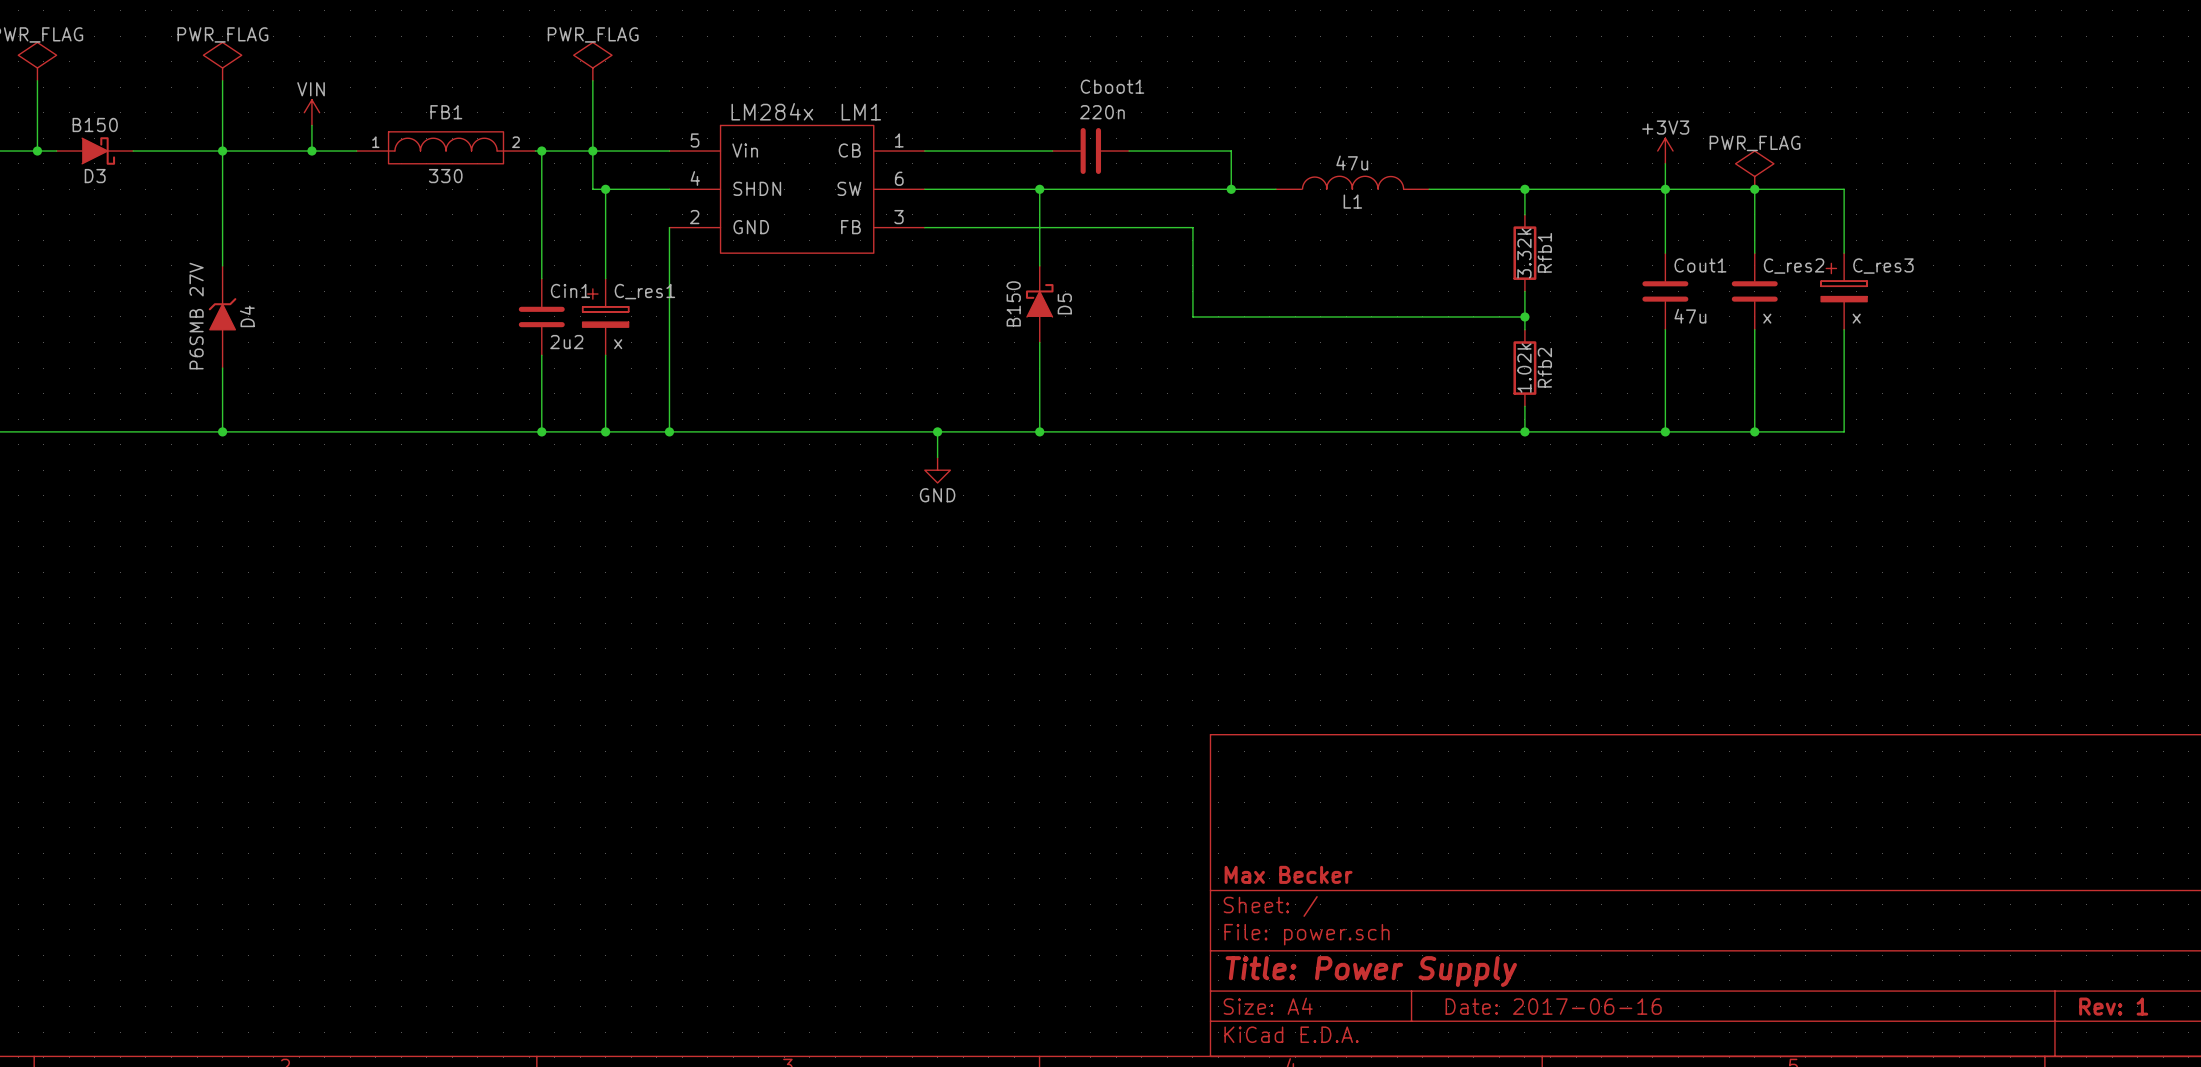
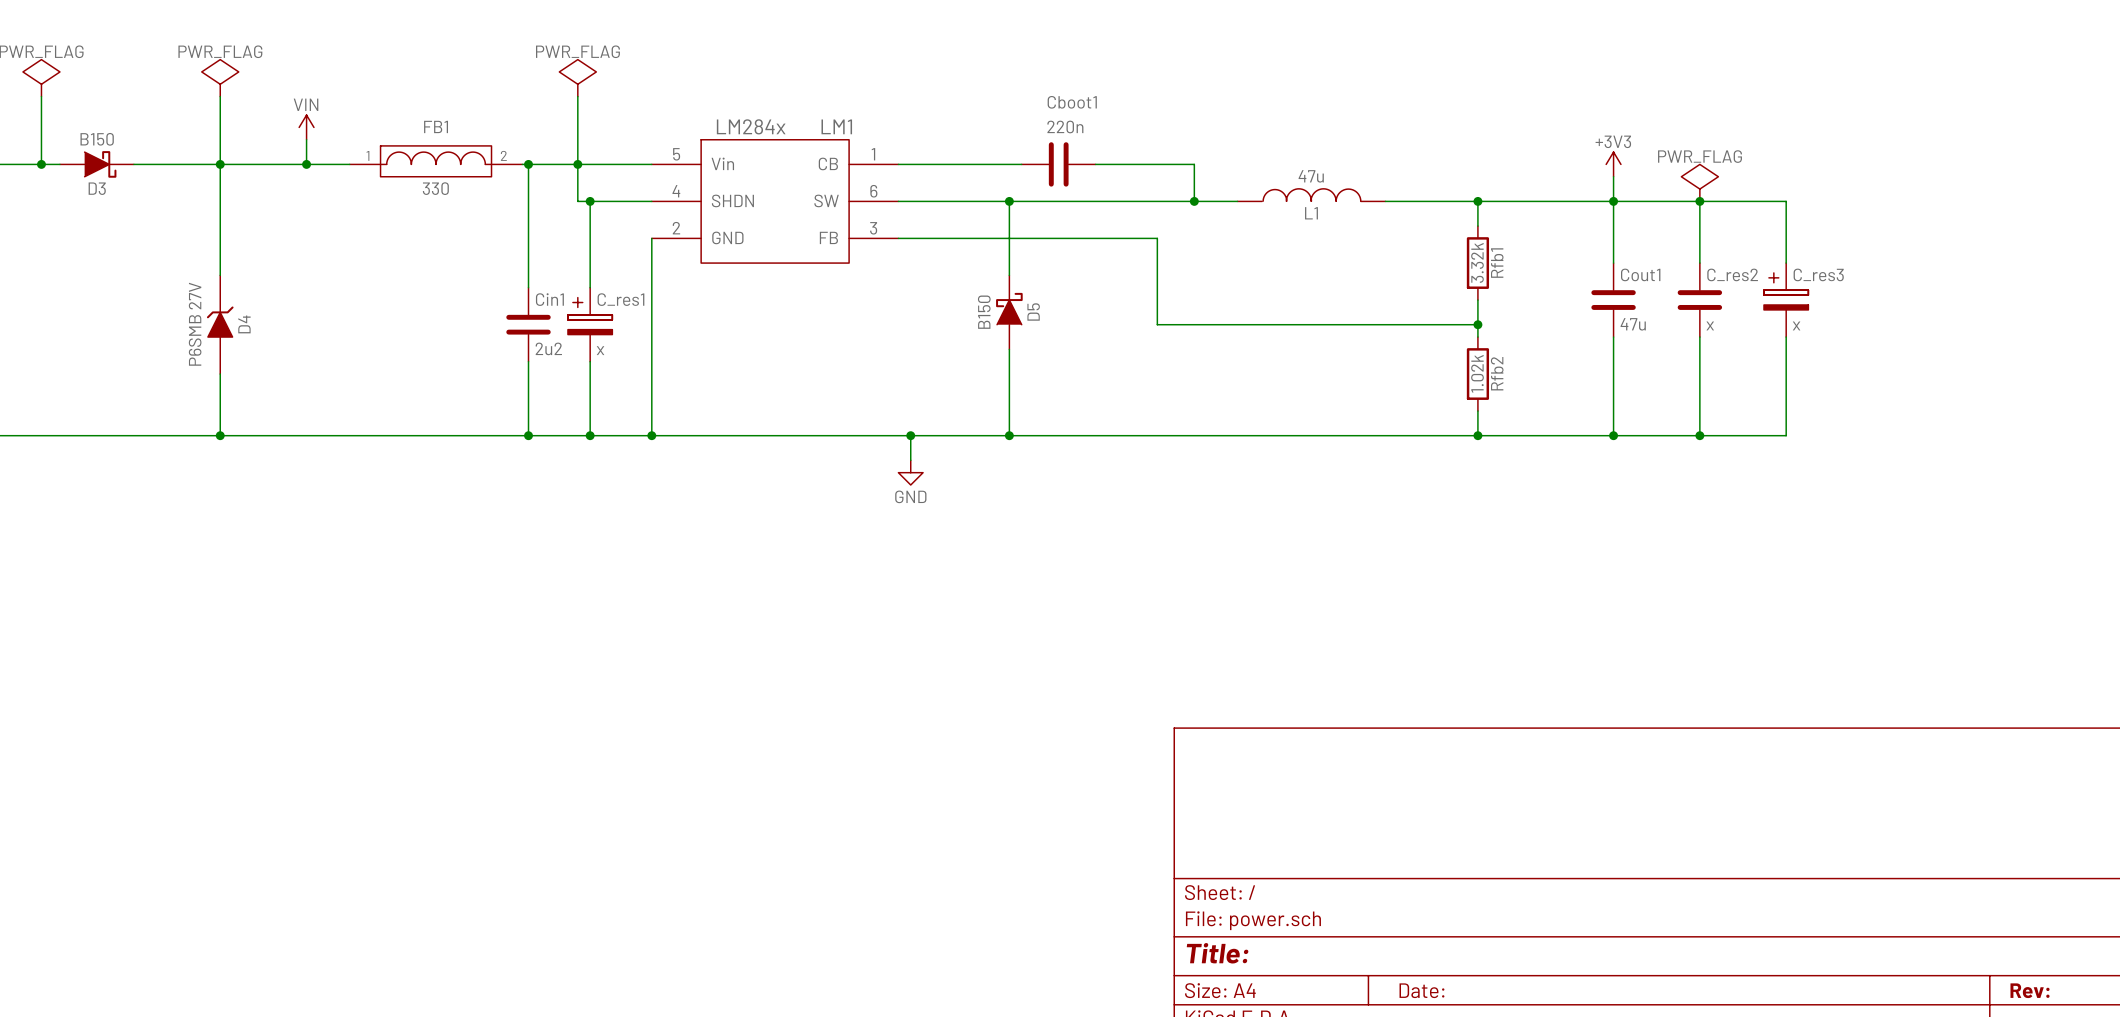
title block: Max Becker (1288, 874) -> none
title block: Title: Power Supply (1371, 971) -> Title: (1217, 953)
title block: Date: 2017-06-16 (1553, 1006) -> Date: (1421, 990)
title block: Rev: 1 (2113, 1006) -> Rev: (2030, 990)

